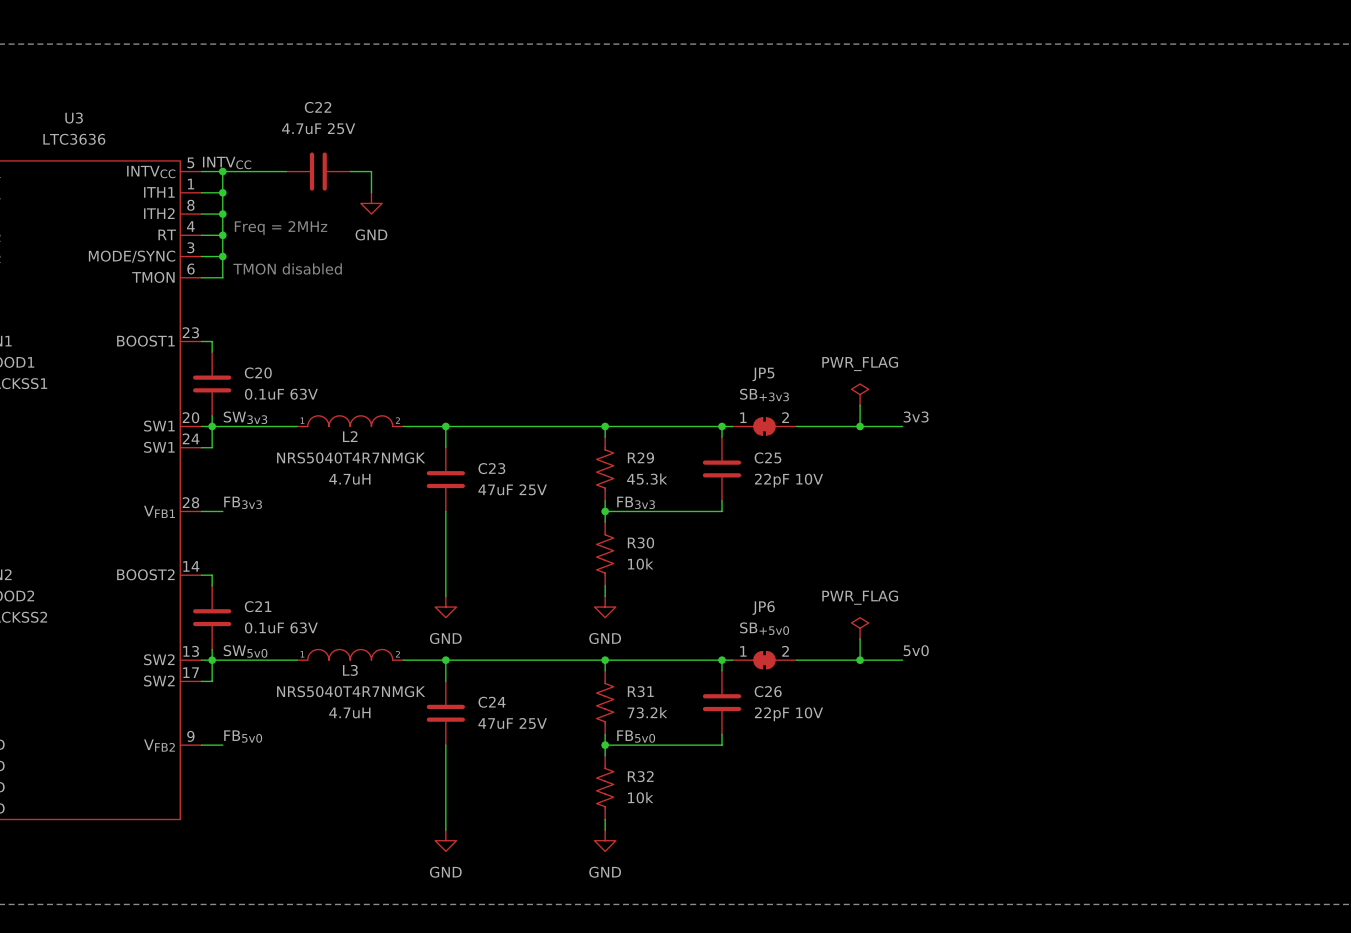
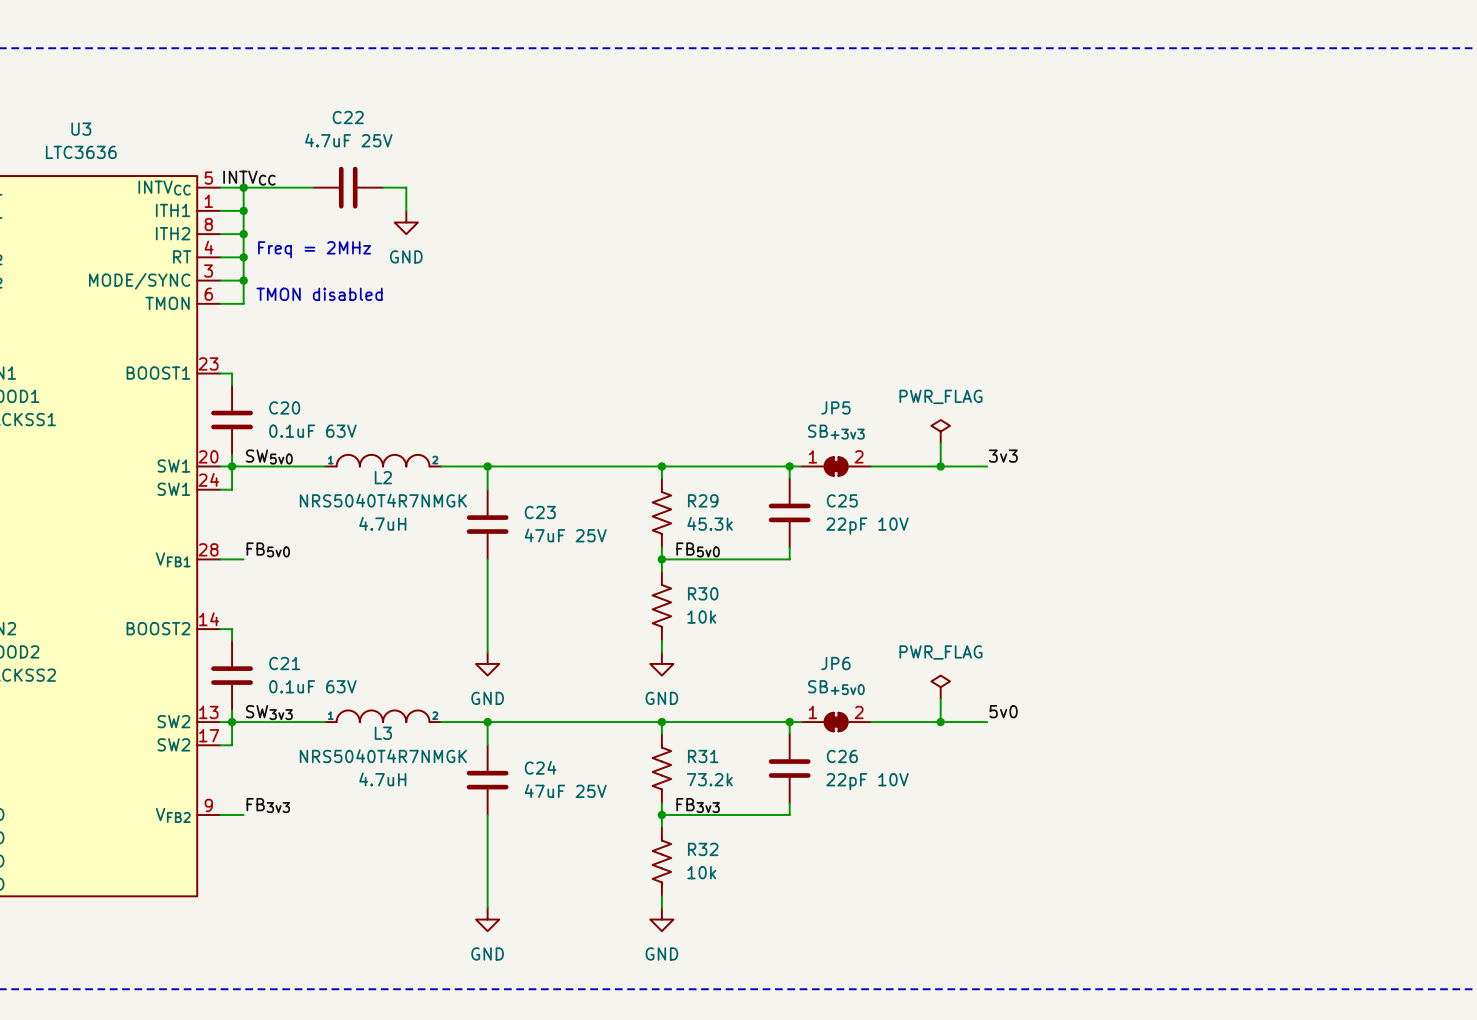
label: SW3v3 (245, 417) -> SW5v0 (269, 456)
label: FB3v3 (243, 502) -> FB5v0 (268, 549)
label: FB3v3 (636, 502) -> FB5v0 (698, 549)
label: SW5v0 (245, 651) -> SW3v3 (269, 712)
label: FB5v0 (243, 736) -> FB3v3 (268, 805)
label: FB5v0 (636, 736) -> FB3v3 (698, 805)

